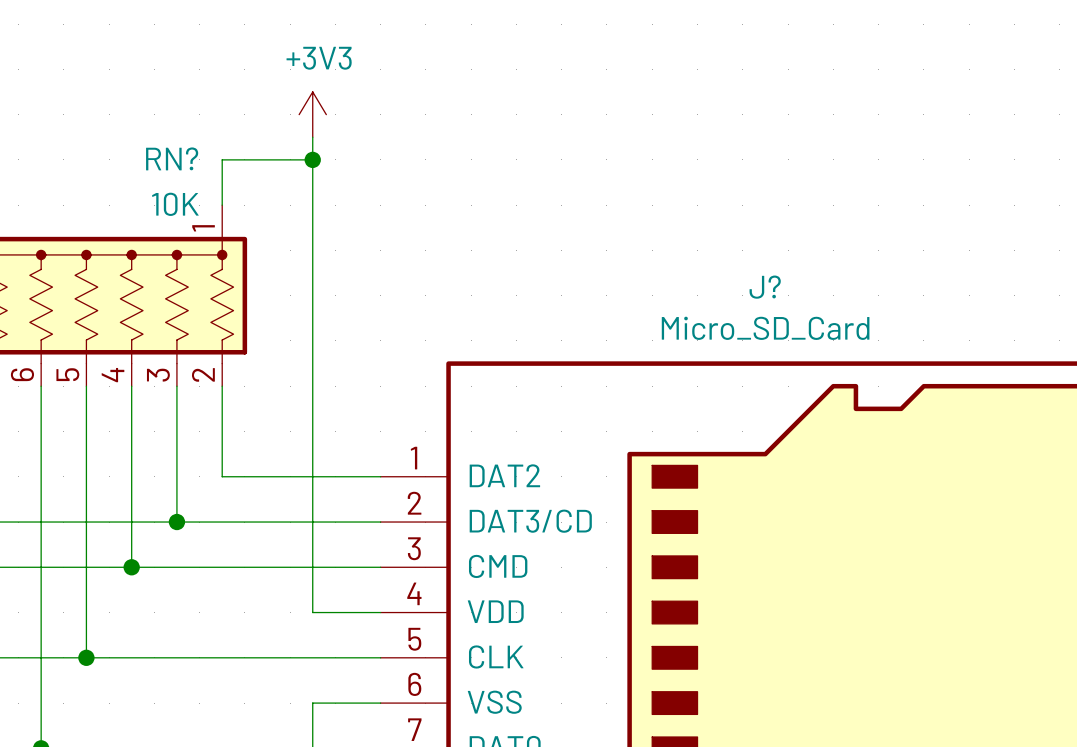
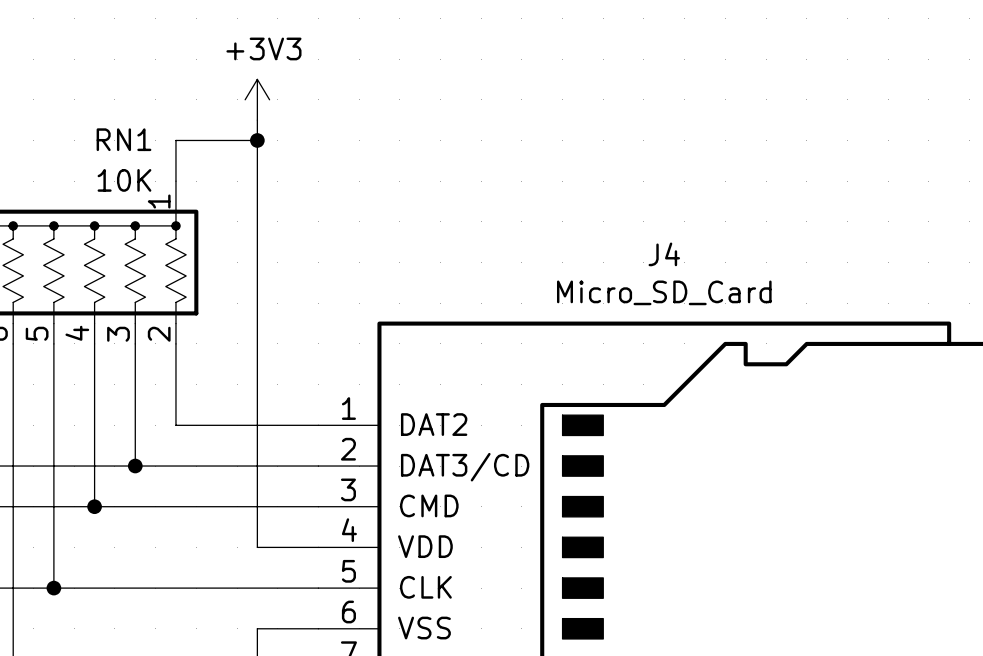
RN? name: RN? (172, 158) -> RN1 (123, 139)
J? name: J? (765, 287) -> J4 (664, 254)

